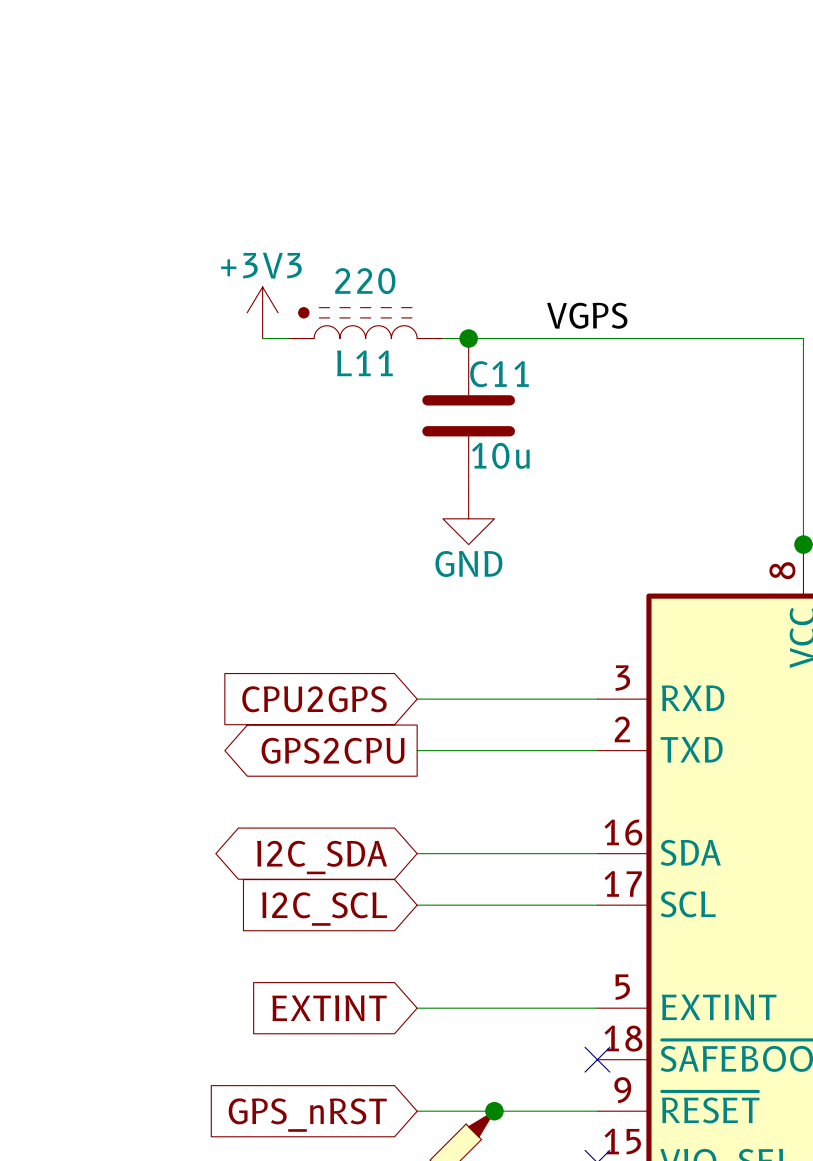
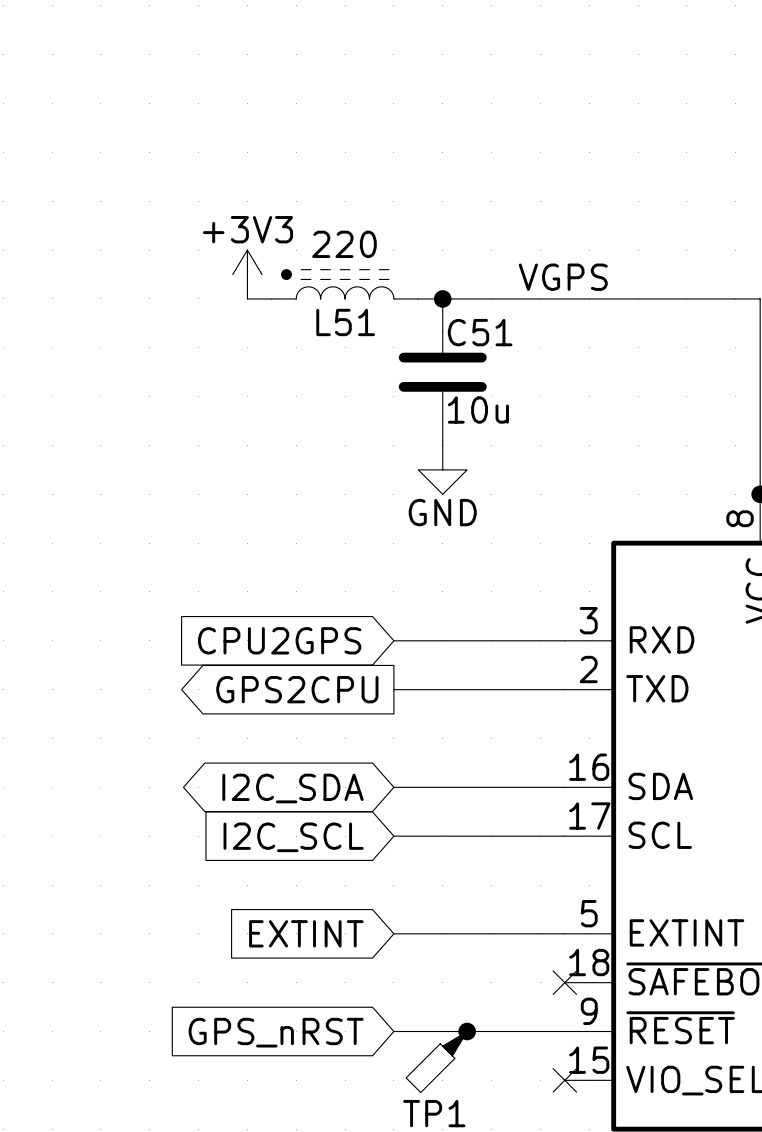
L11 name: L11 (364, 363) -> L51 (345, 322)
C11 name: C11 (499, 374) -> C51 (480, 332)

